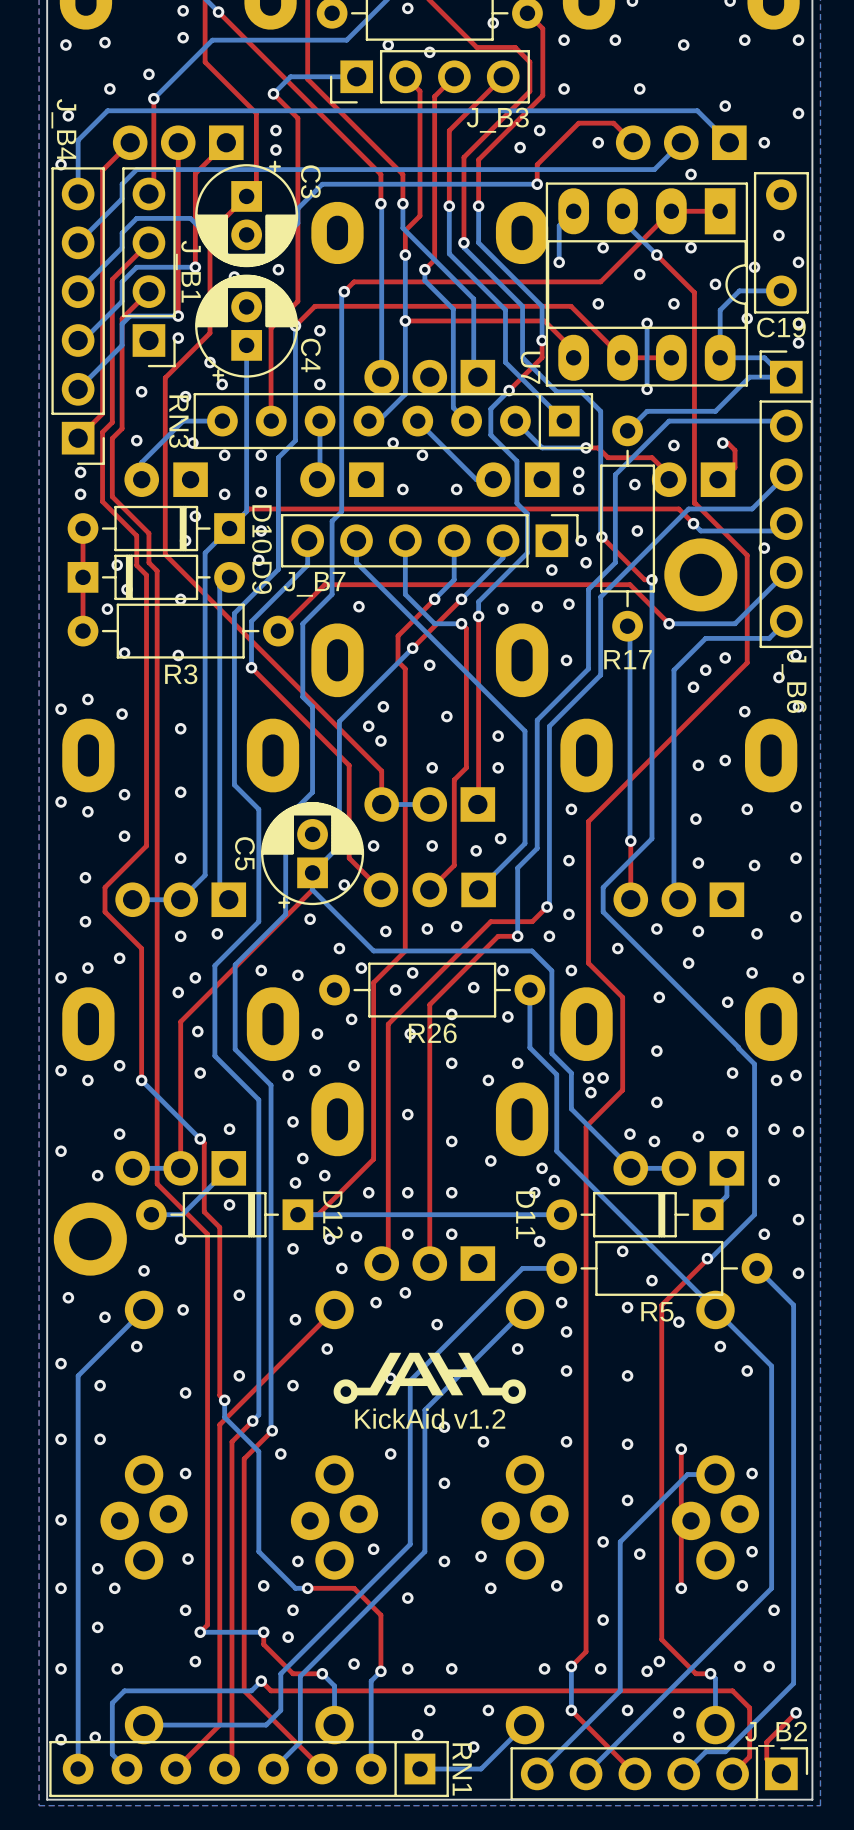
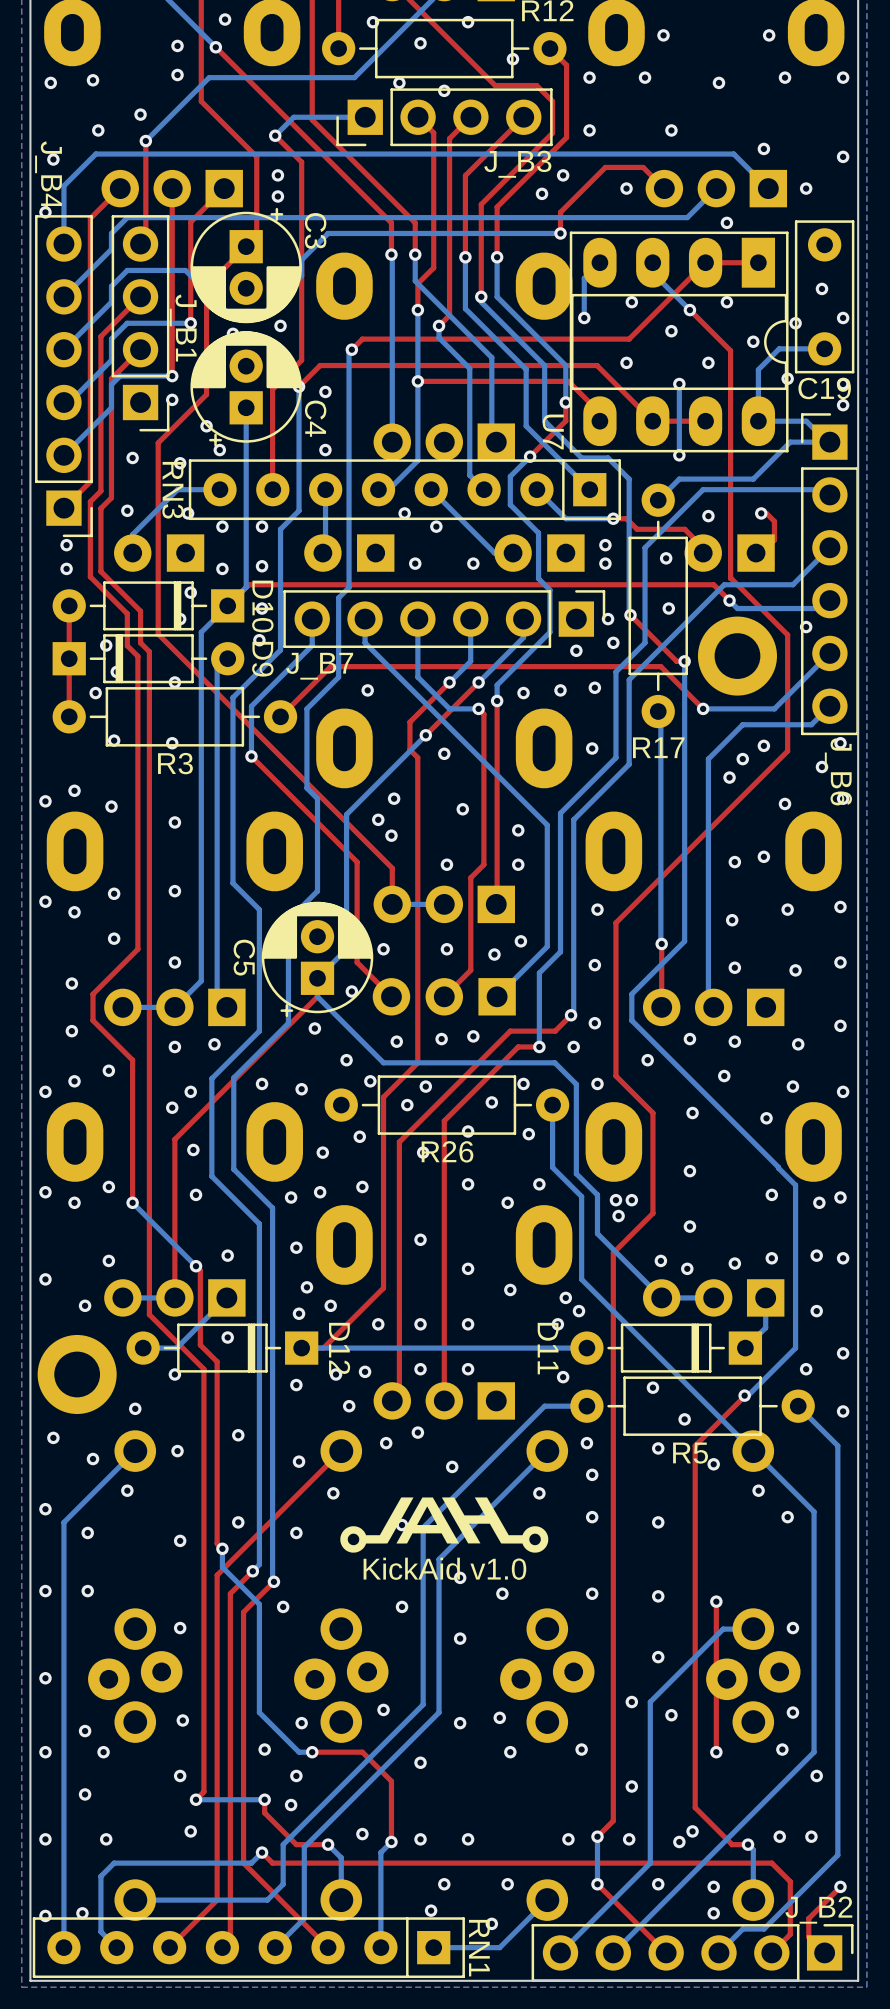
text: KickAid v1.2 (430, 1418) -> KickAid v1.0 (444, 1568)

